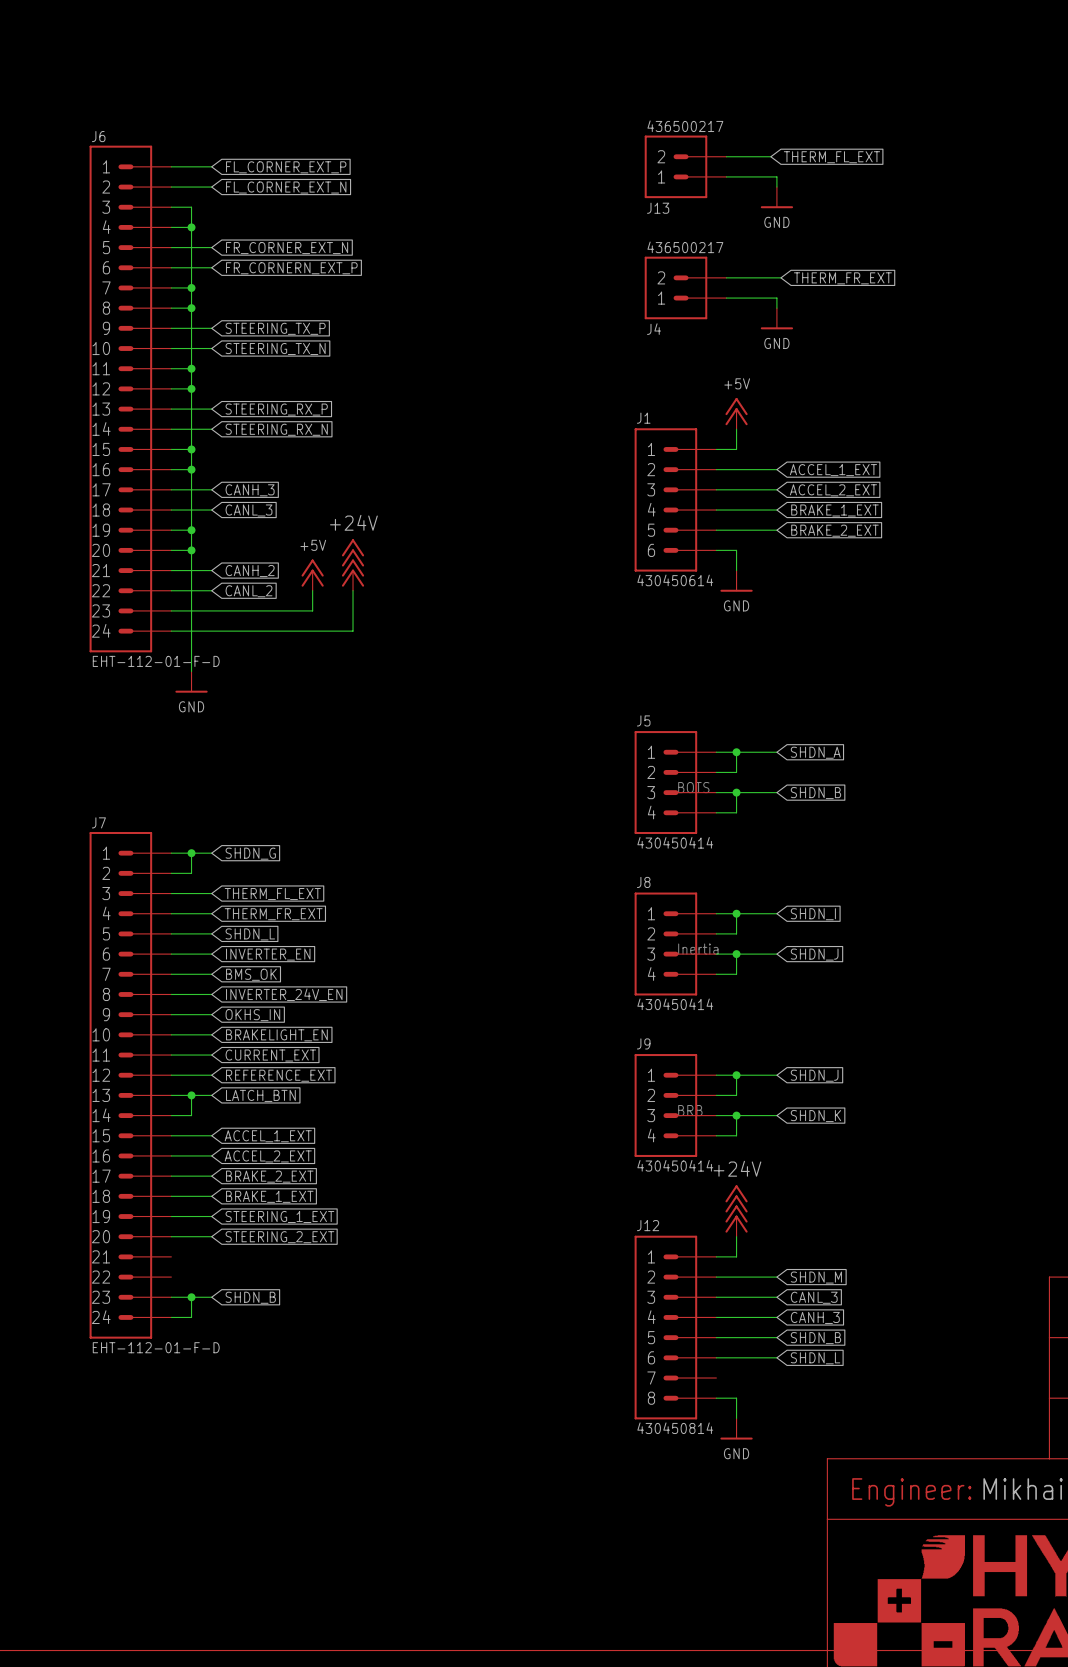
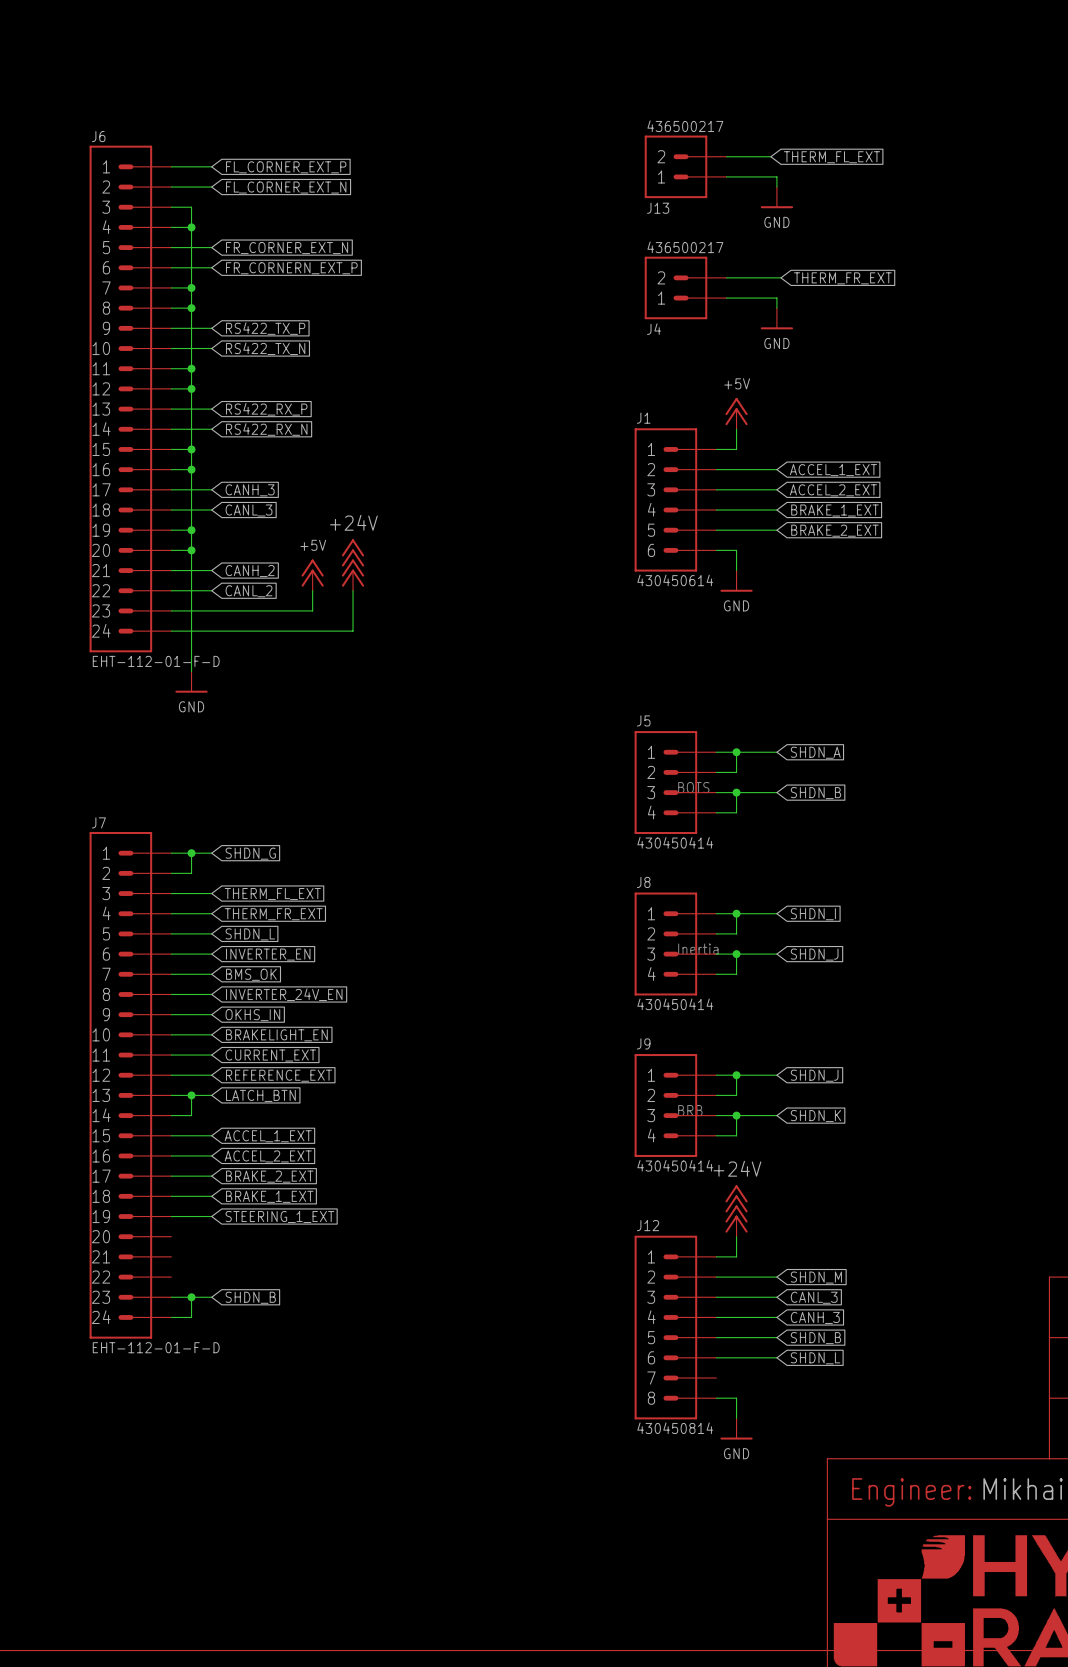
global label: STEERING_TX_P (275, 328) -> RS422_TX_P (265, 328)
global label: STEERING_TX_N (275, 349) -> RS422_TX_N (265, 348)
global label: STEERING_RX_P (276, 409) -> RS422_RX_P (266, 409)
global label: STEERING_RX_N (276, 429) -> RS422_RX_N (266, 429)
wire: (171, 1236) (211, 1236) -> none
global label: STEERING_2_EXT (279, 1237) -> none

